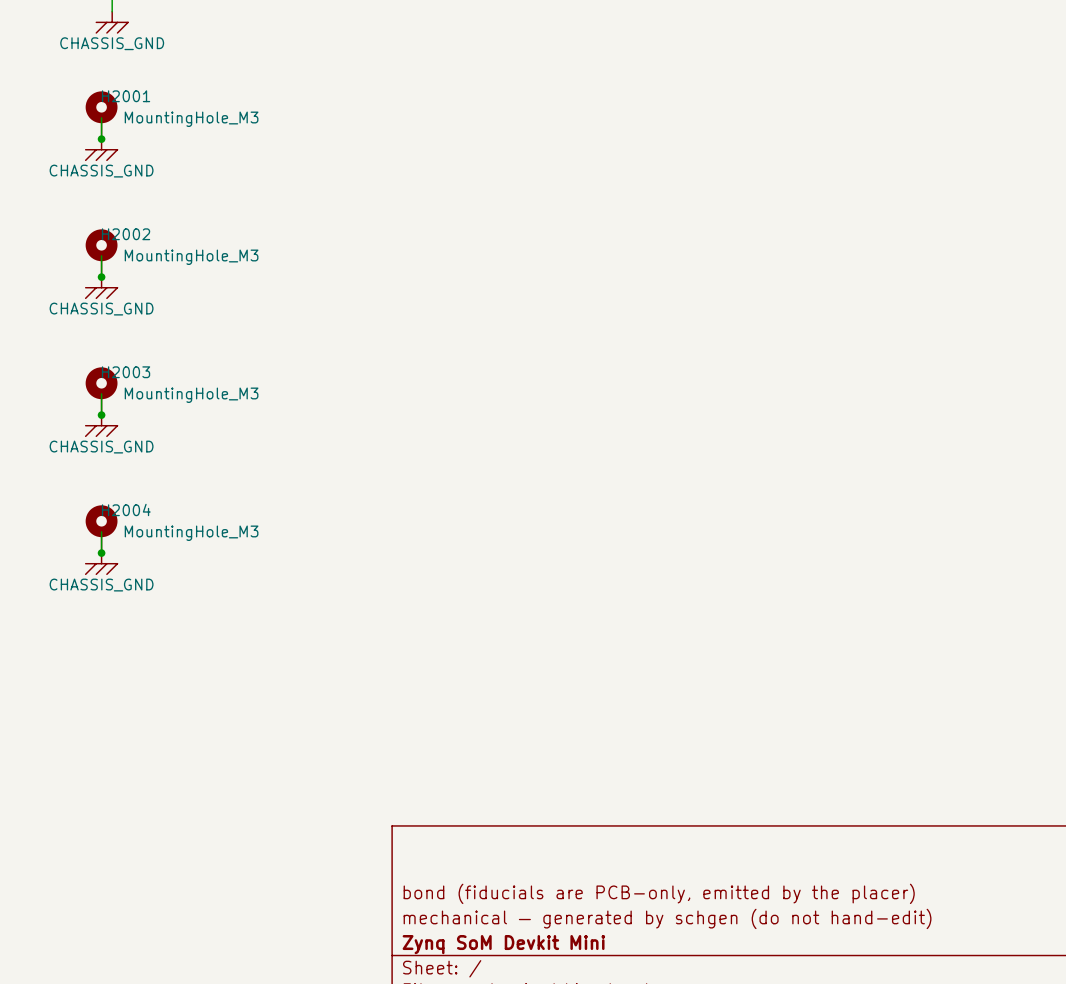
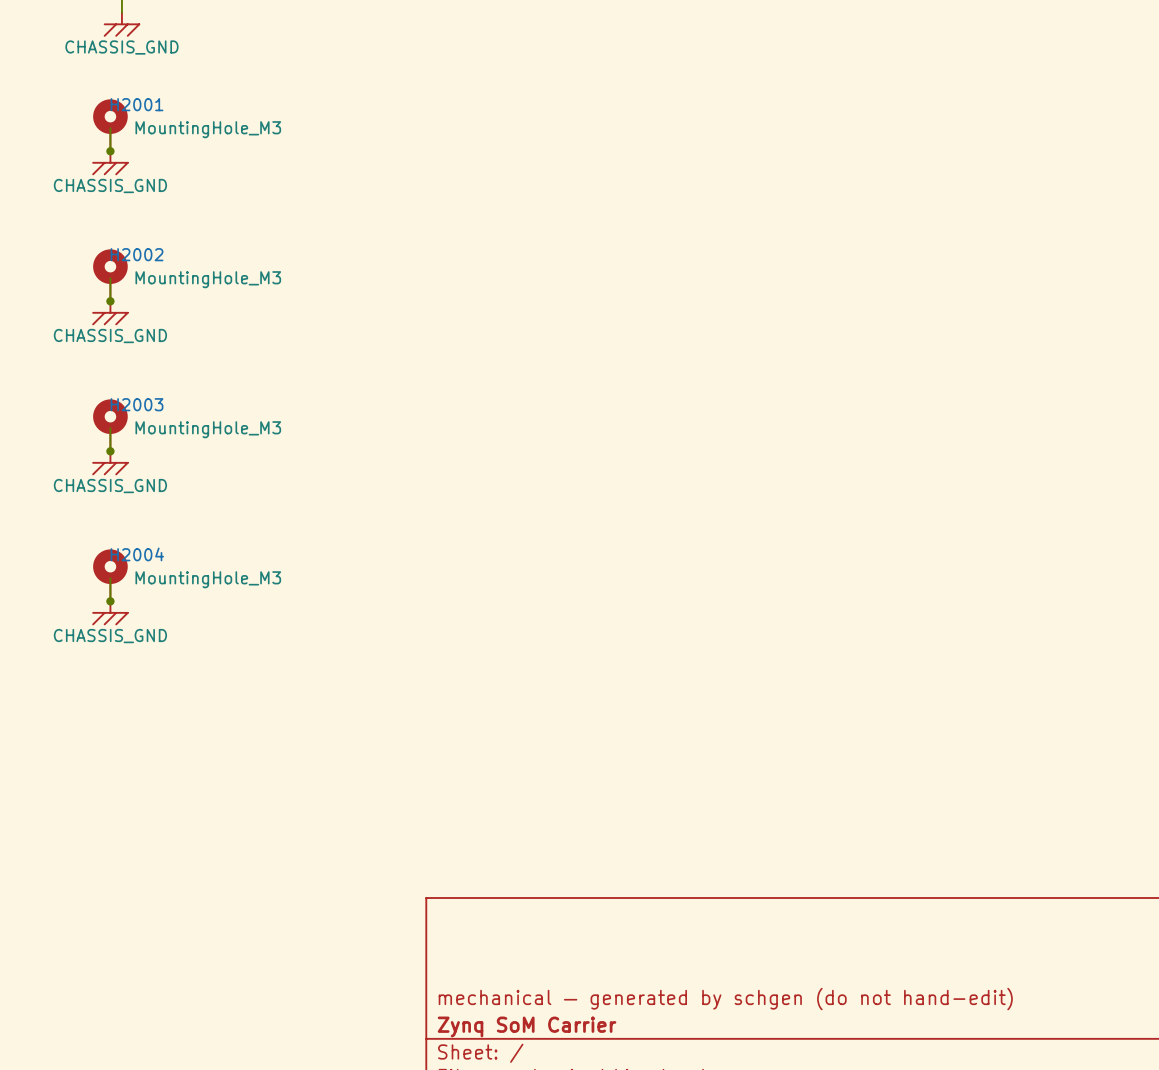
title block: bond (fiducials are PCB-only, emitted by the placer) (659, 893) -> none
title block: Zynq SoM Devkit Mini (503, 944) -> Zynq SoM Carrier (527, 1026)

